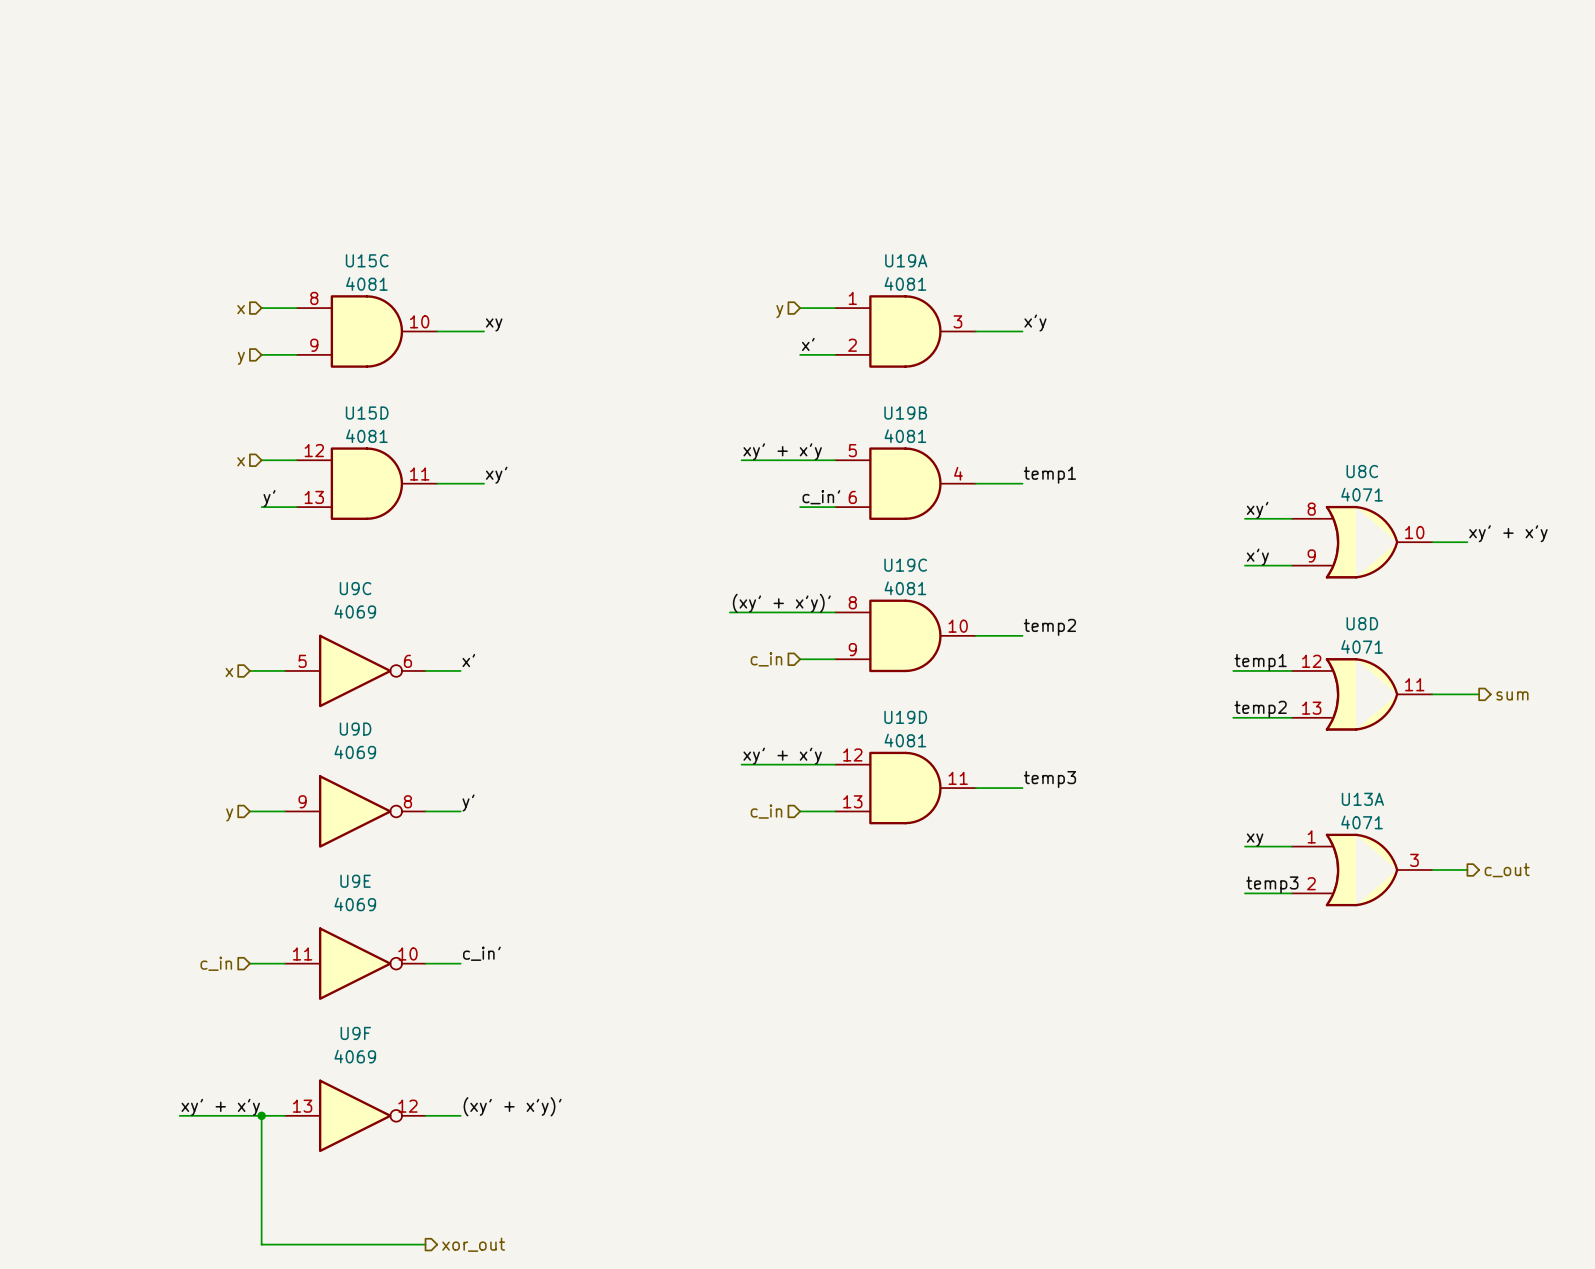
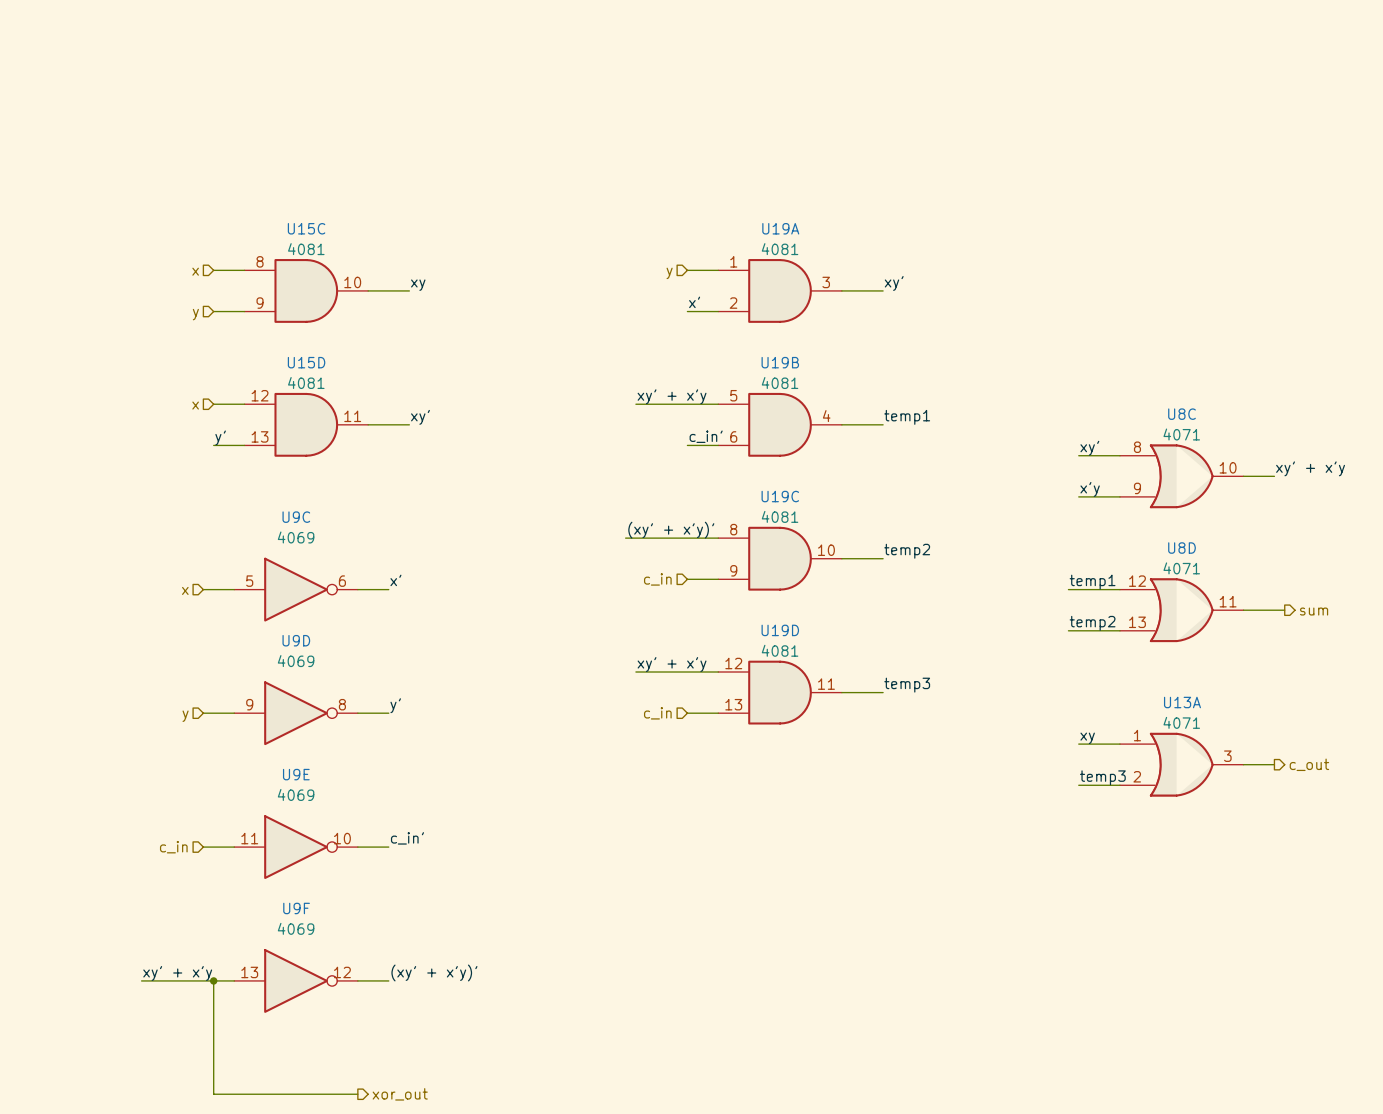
label: x'y (1035, 322) -> xy' (894, 283)

